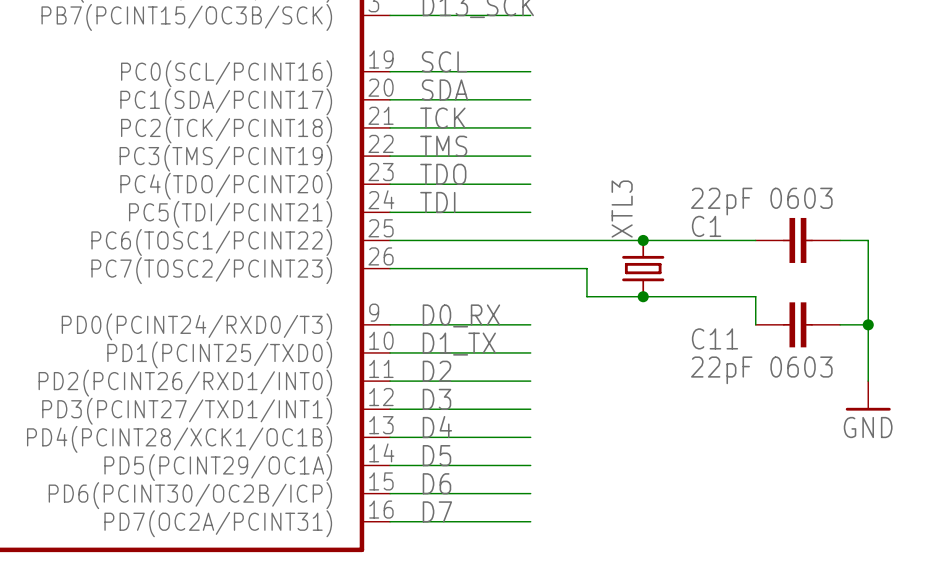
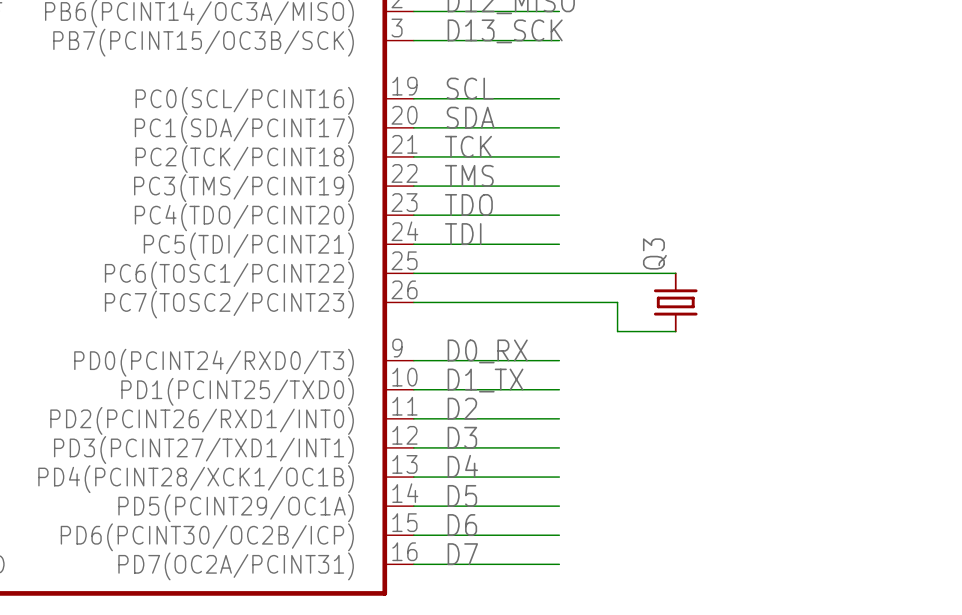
XTL3 name: XTL3 (622, 209) -> Q3 (654, 253)
wire: (643, 240) (755, 240) -> none
junction: (643, 240) -> none
C1: 22pF 0603 (797, 240) -> none
wire: (840, 240) (868, 240) (868, 381) -> none
wire: (643, 296) (755, 296) (755, 324) -> none
junction: (643, 296) -> none
C11: 22pF 0603 (797, 324) -> none
wire: (840, 324) (868, 324) -> none
junction: (868, 324) -> none
power symbol: GND (868, 395) -> none

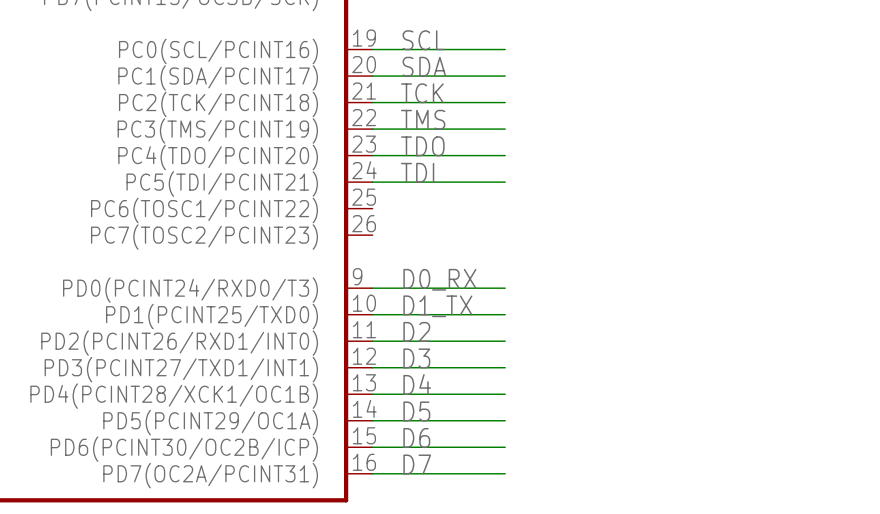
wire: (413, 273) (675, 273) -> none
wire: (413, 302) (617, 302) (617, 331) (675, 331) -> none
Q3: (675, 302) -> none

